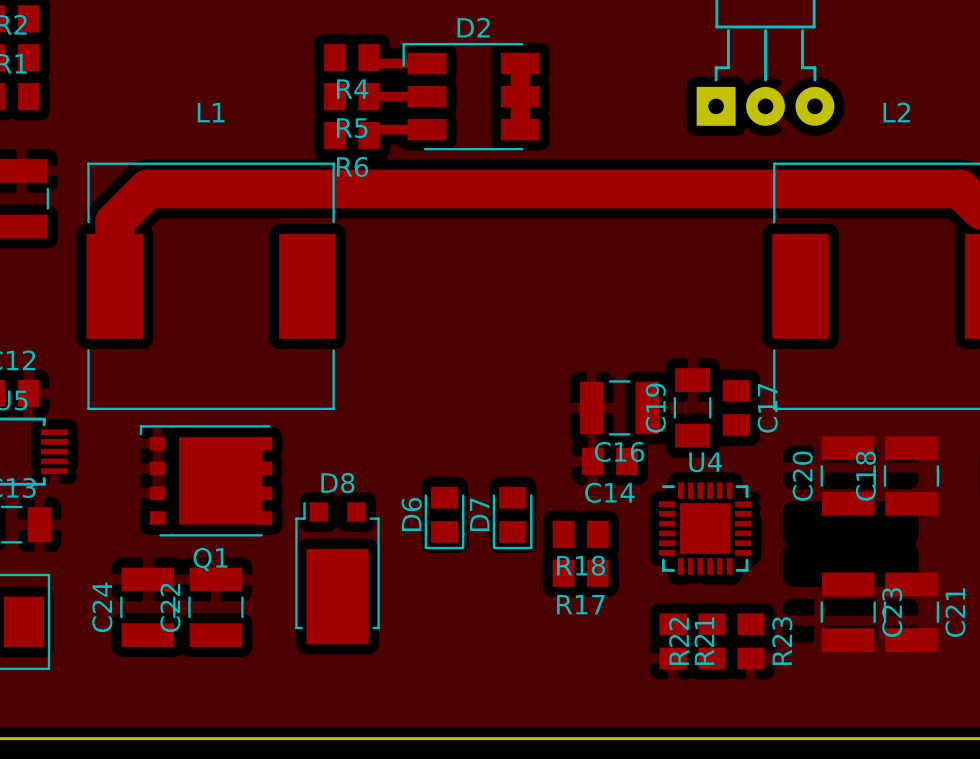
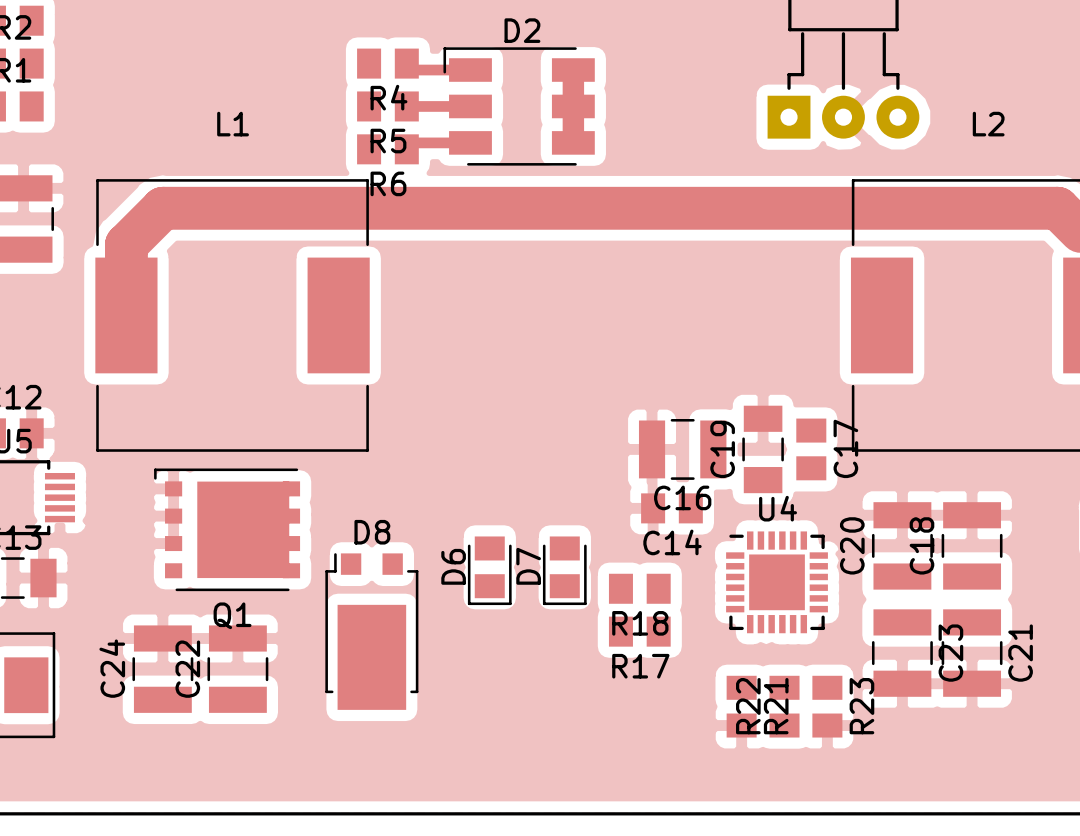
C20 position: (848, 475) -> (902, 545)
C18 position: (911, 475) -> (972, 545)
C23 position: (848, 612) -> (902, 653)
C21 position: (911, 612) -> (972, 653)

